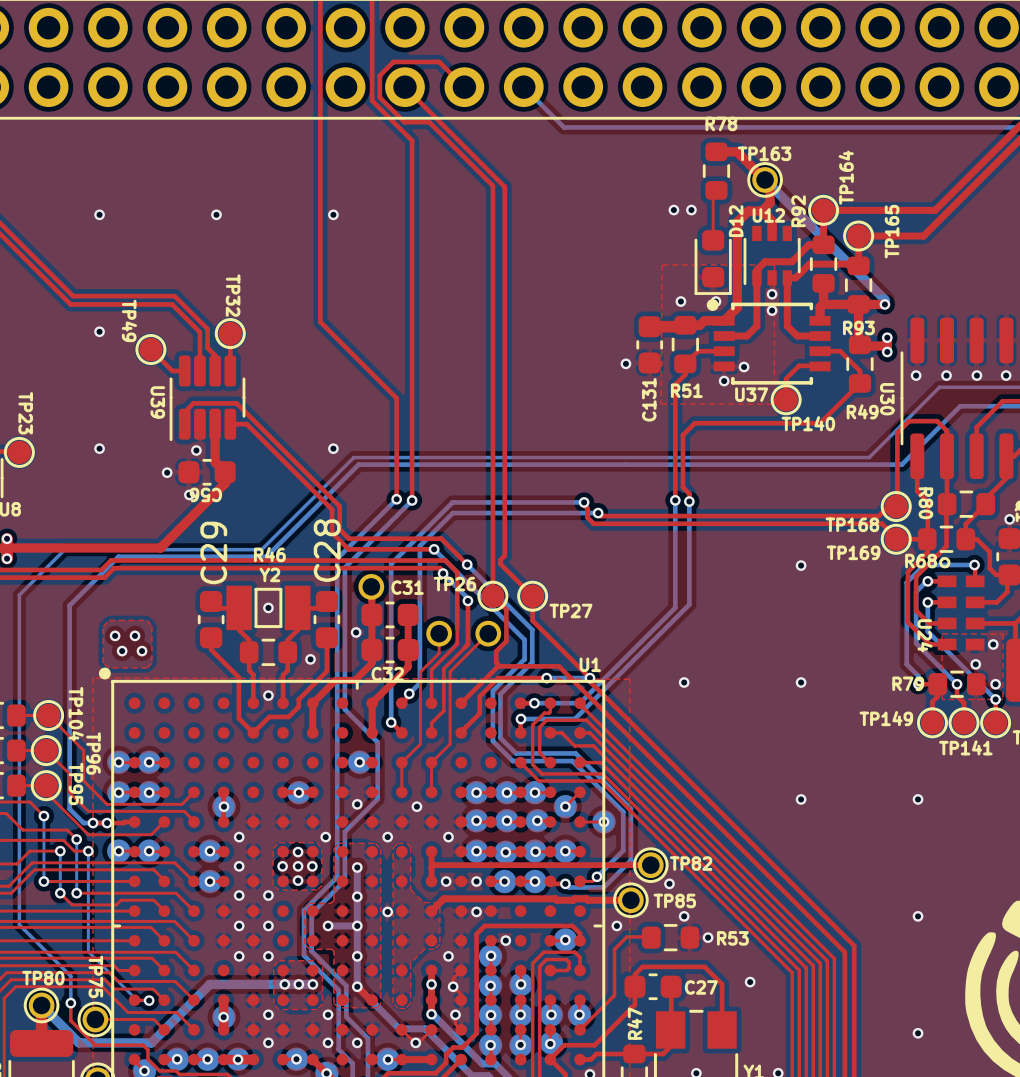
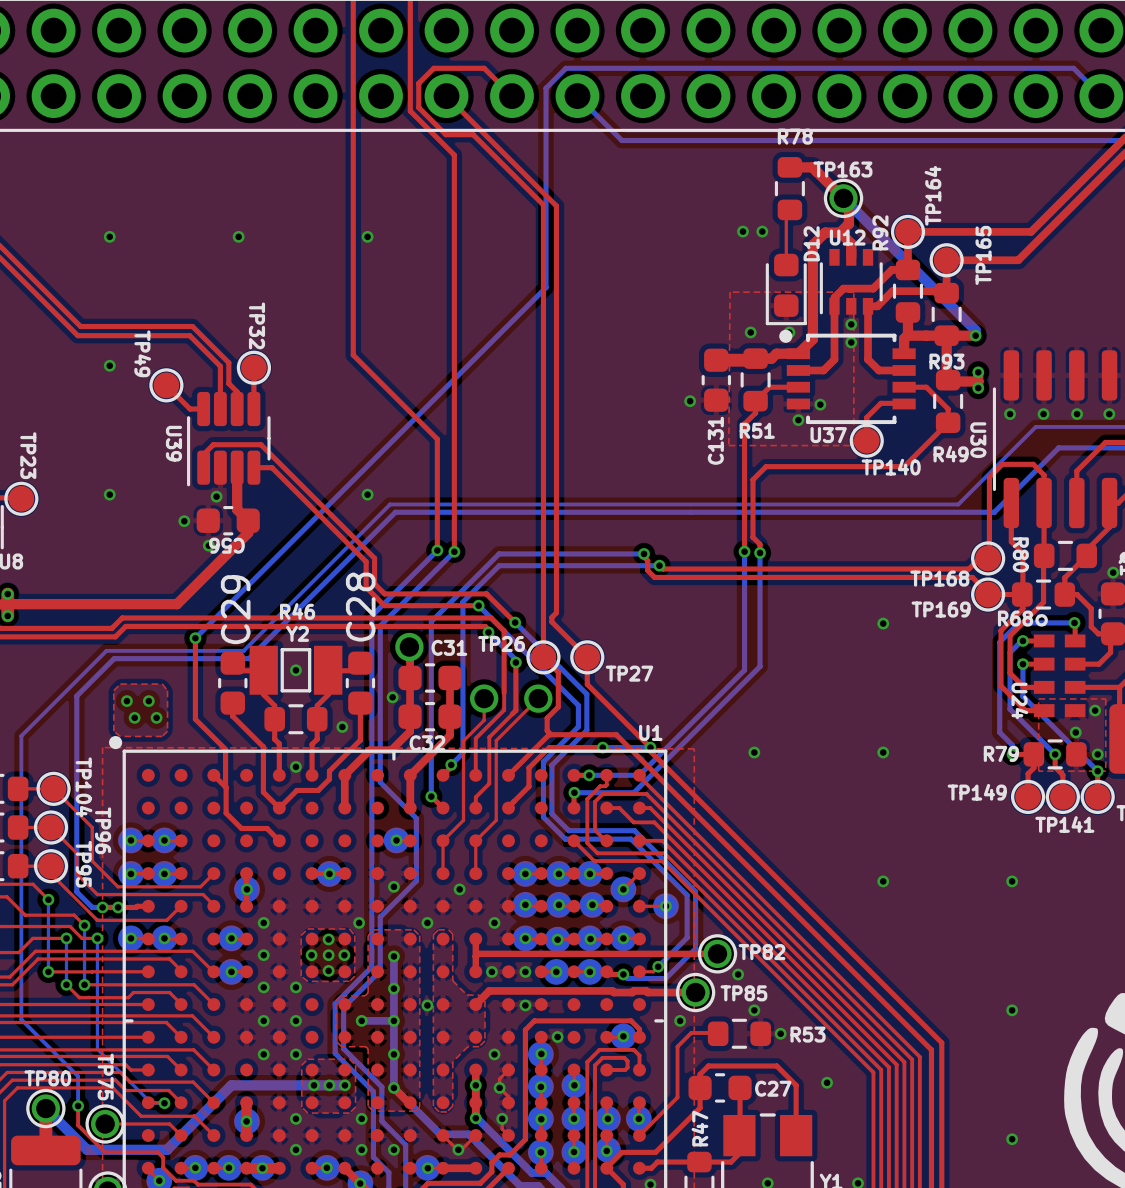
bottom track: none -> (1101, 96) (1073, 68) (565, 68) (546, 88) (546, 287) (195, 638)
bottom track: (261, 549) (64, 549) (19, 595) (19, 667) -> (288, 606) (243, 650) (106, 650) (21, 736)
bottom track: (266, 556) (118, 556) (69, 605) (69, 631) -> (293, 613) (249, 658) (114, 658) (76, 696)
top track: none -> (195, 638) (195, 719) (225, 749) (225, 787)
via: none -> (195, 638)
top track: none -> (213, 775) (226, 787) (226, 813) (241, 828) (267, 828) (279, 840)

